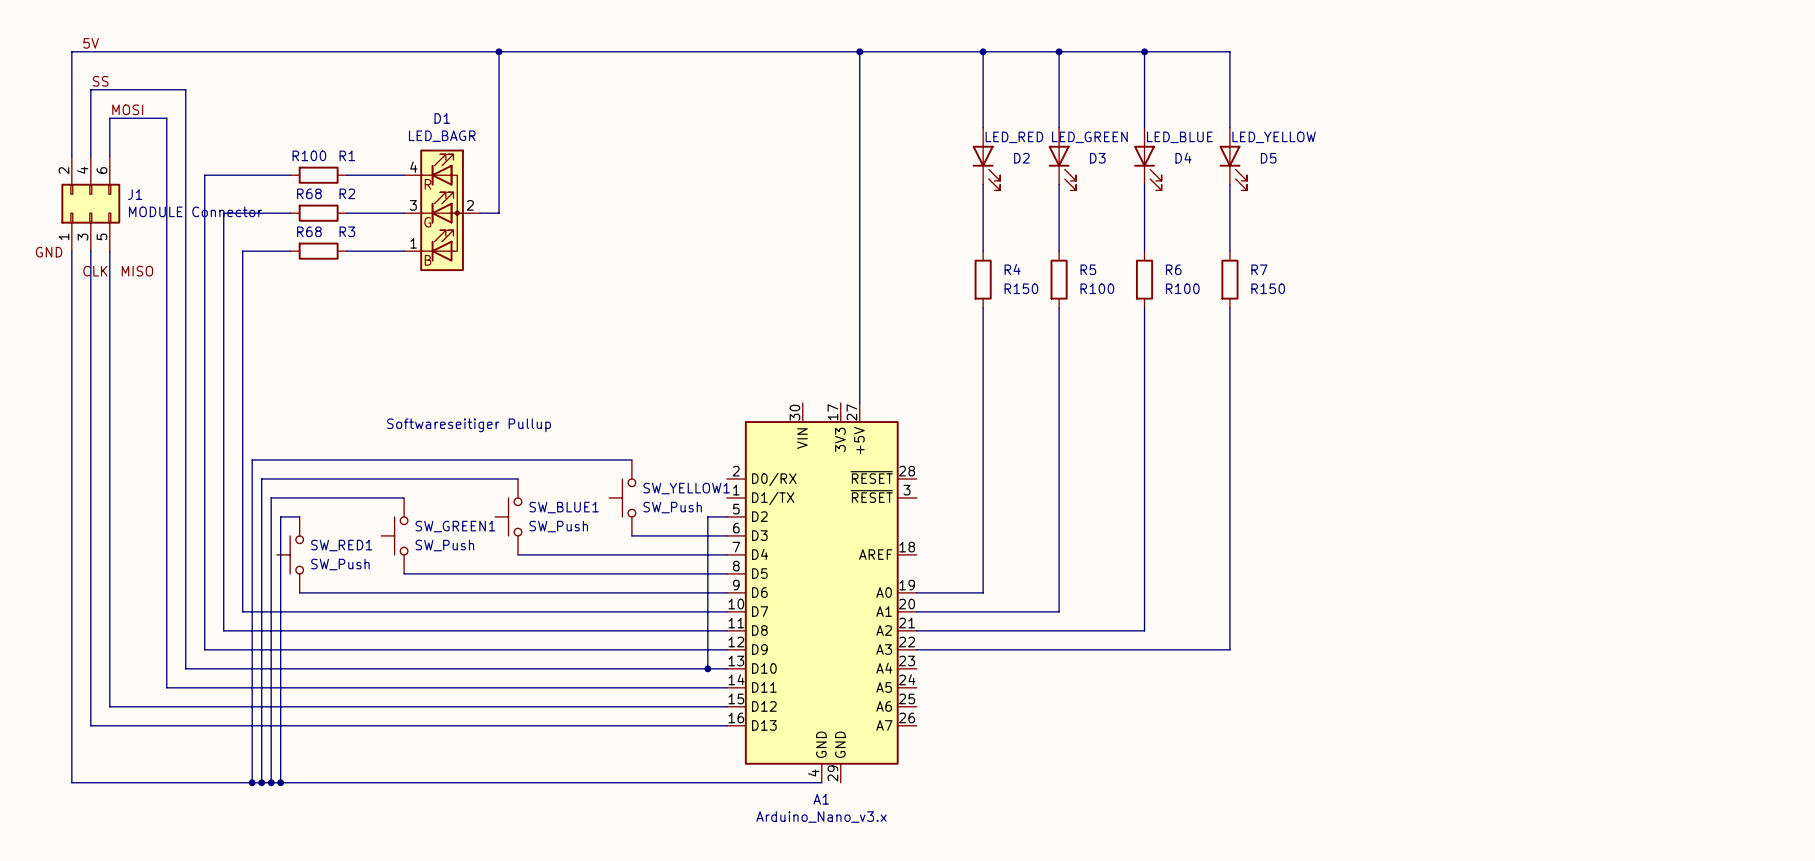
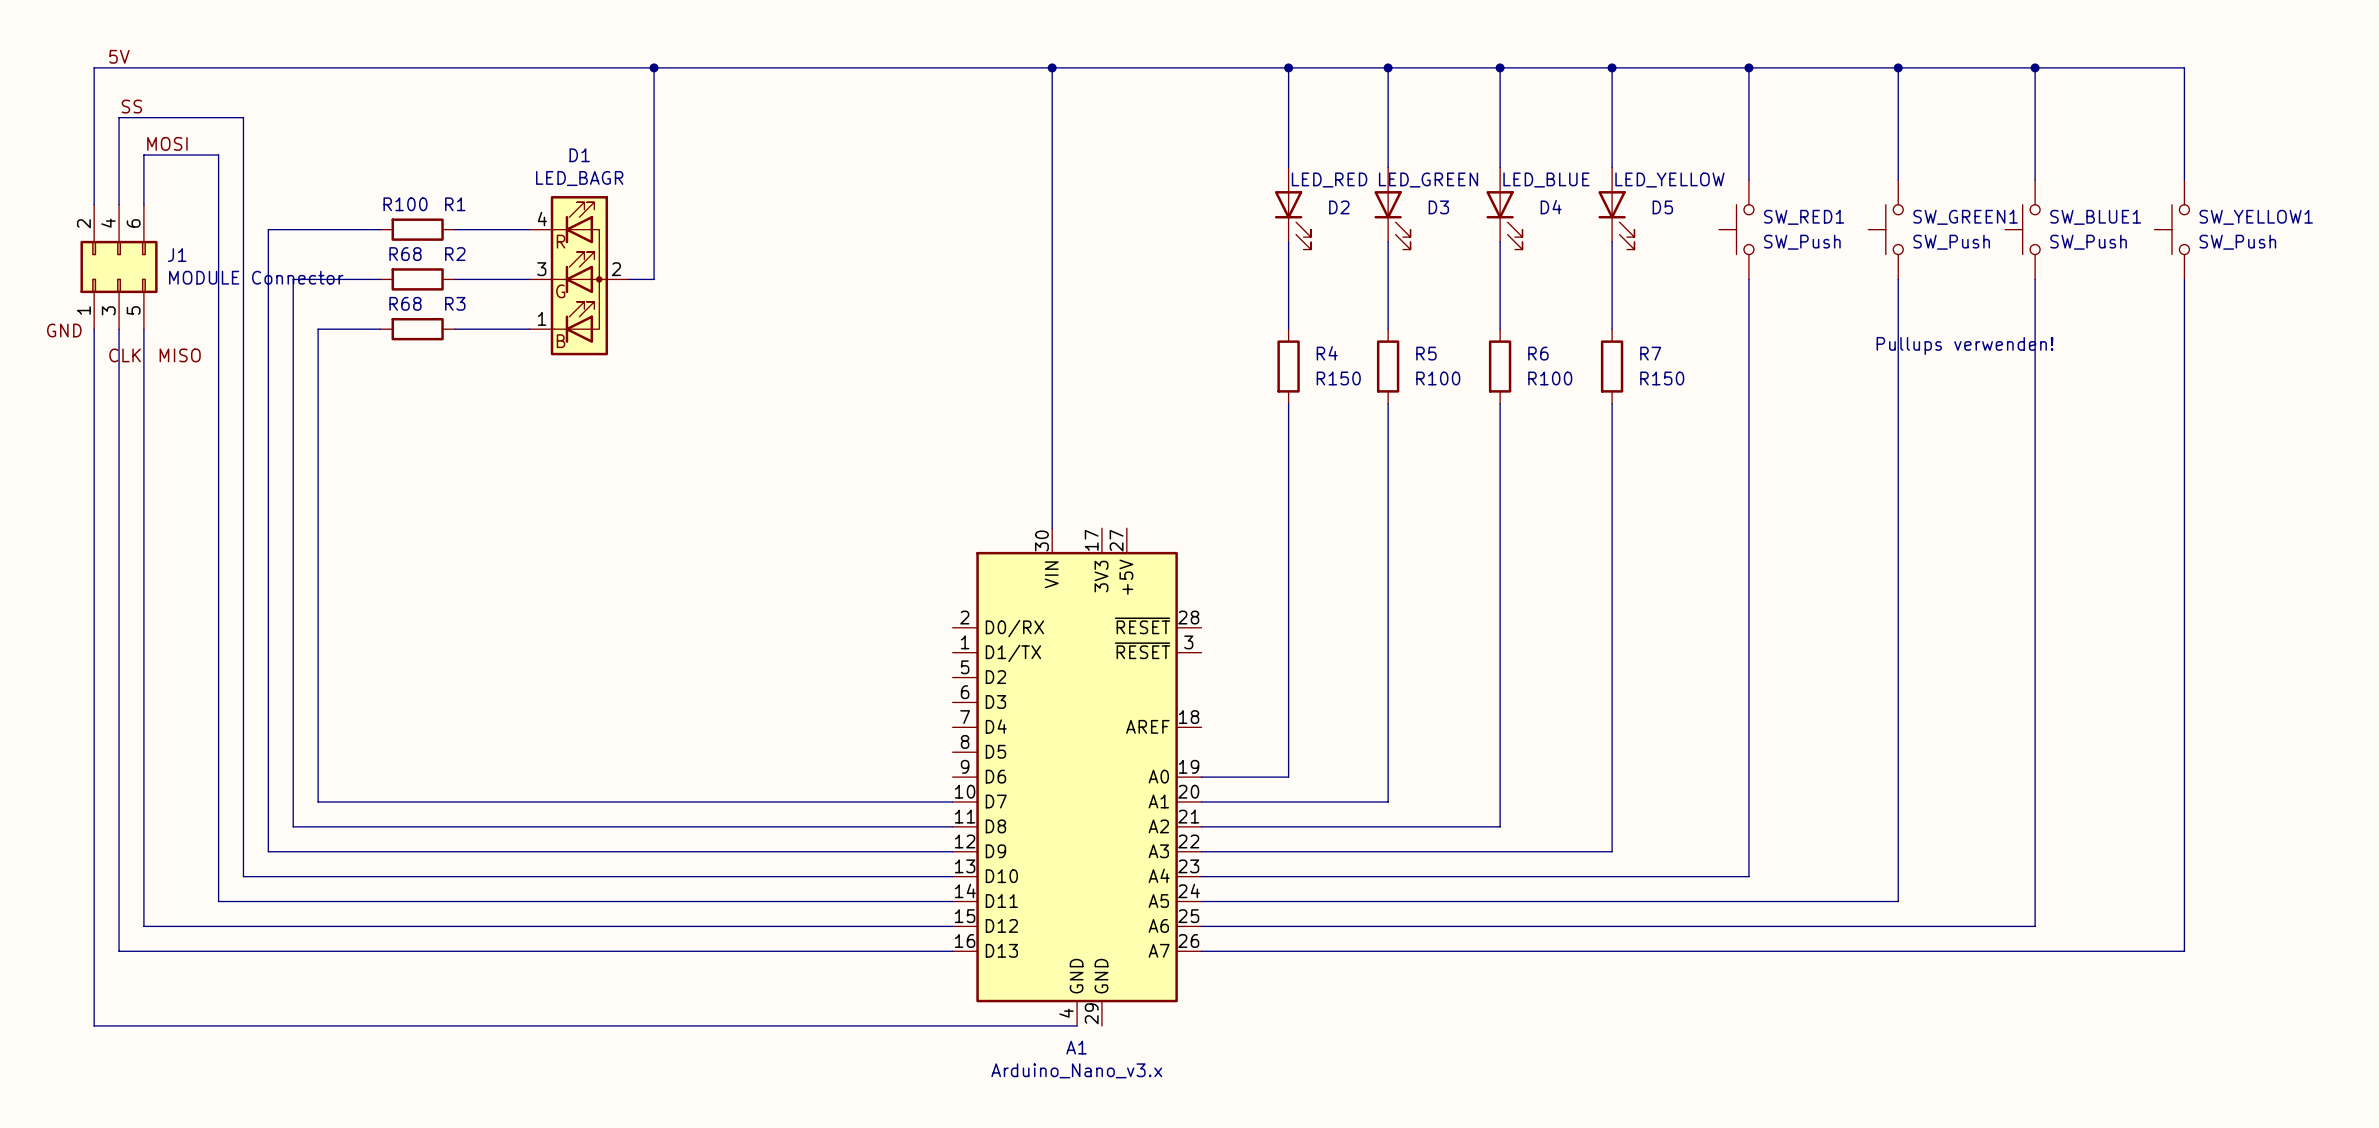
junction: none -> (1052, 67)
wire: (859, 51) (859, 403) -> (1052, 67) (1052, 528)
junction: (859, 51) -> none
wire: none -> (1612, 67) (2184, 67) (2184, 179)
junction: none -> (1612, 67)
wire: none -> (1748, 67) (1748, 179)
junction: none -> (1748, 67)
wire: none -> (1898, 67) (1898, 179)
junction: none -> (1898, 67)
wire: none -> (2035, 67) (2035, 179)
junction: none -> (2035, 67)
wire: none -> (1748, 279) (1748, 876) (1201, 876)
wire: none -> (1898, 279) (1898, 901) (1201, 901)
wire: none -> (2035, 279) (2035, 926) (1201, 926)
wire: none -> (2184, 279) (2184, 951) (1201, 951)
text: none -> Pullups verwenden! (1965, 345)
text: Softwareseitiger Pullup (469, 425) -> none
wire: (631, 460) (252, 460) (252, 782) -> none
wire: (518, 478) (261, 478) (261, 782) -> none
wire: (404, 497) (271, 497) (271, 782) -> none
SW_YELLOW1 position: (622, 497) -> (2171, 229)
wire: (299, 516) (280, 516) (280, 782) -> none
SW_BLUE1 position: (508, 516) -> (2022, 229)
wire: (726, 516) (707, 516) (707, 668) -> none
SW_GREEN1 position: (394, 535) -> (1885, 229)
wire: (631, 535) (726, 535) -> none
SW_RED1 position: (290, 554) -> (1736, 229)
wire: (518, 554) (726, 554) -> none
wire: (404, 573) (726, 573) -> none
wire: (299, 592) (726, 592) -> none
junction: (707, 668) -> none
junction: (252, 782) -> none
junction: (261, 782) -> none
junction: (271, 782) -> none
junction: (280, 782) -> none

